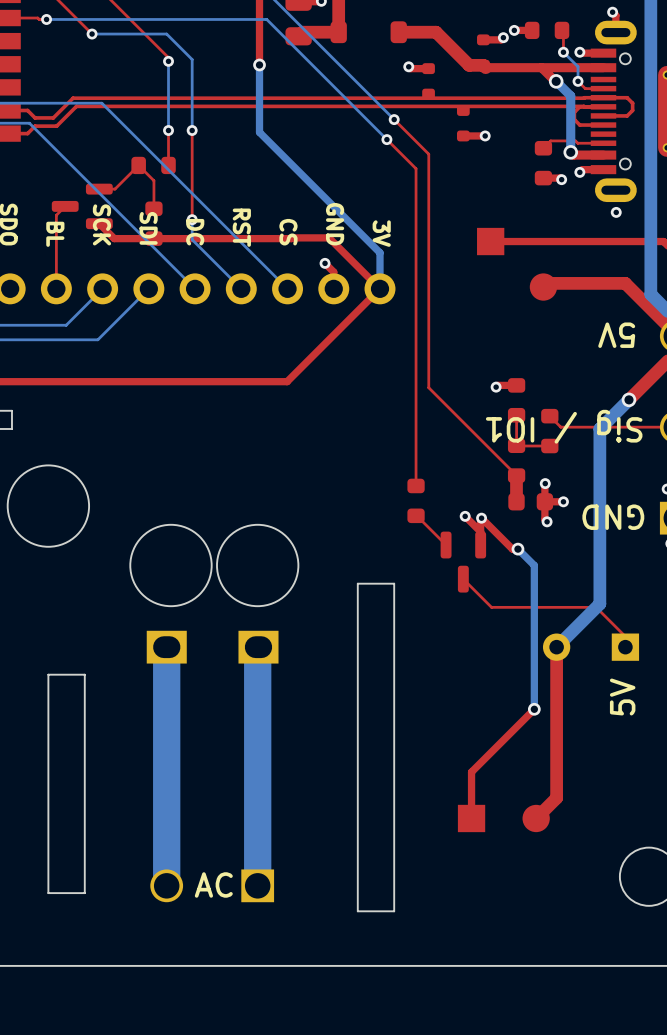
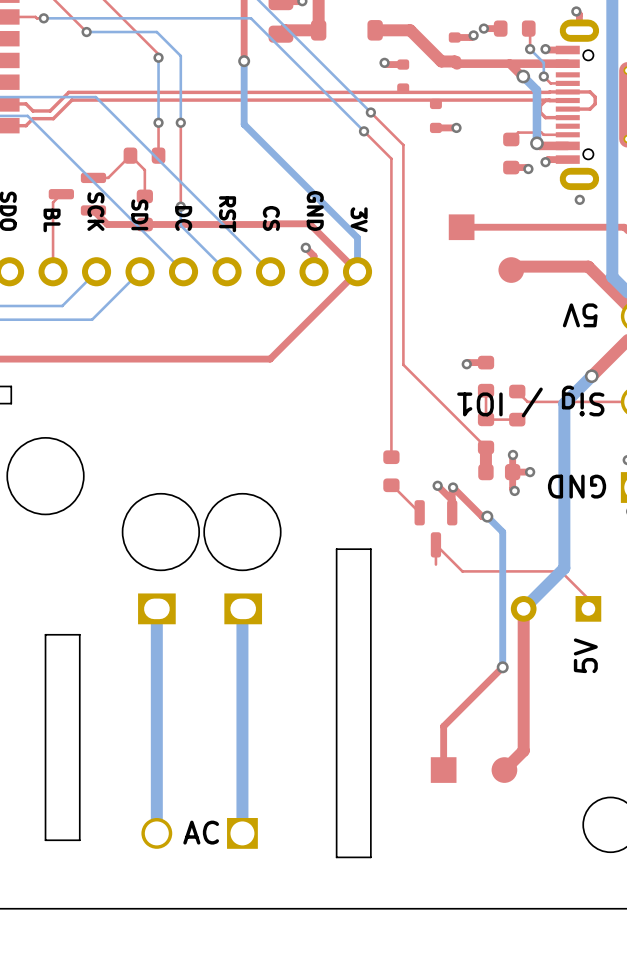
top track: none -> (435, 544) (435, 564)
bottom track width: thick (166, 647) (166, 885) -> thin (156, 608) (156, 833)
bottom track width: thick (258, 647) (257, 885) -> thin (243, 608) (242, 833)

